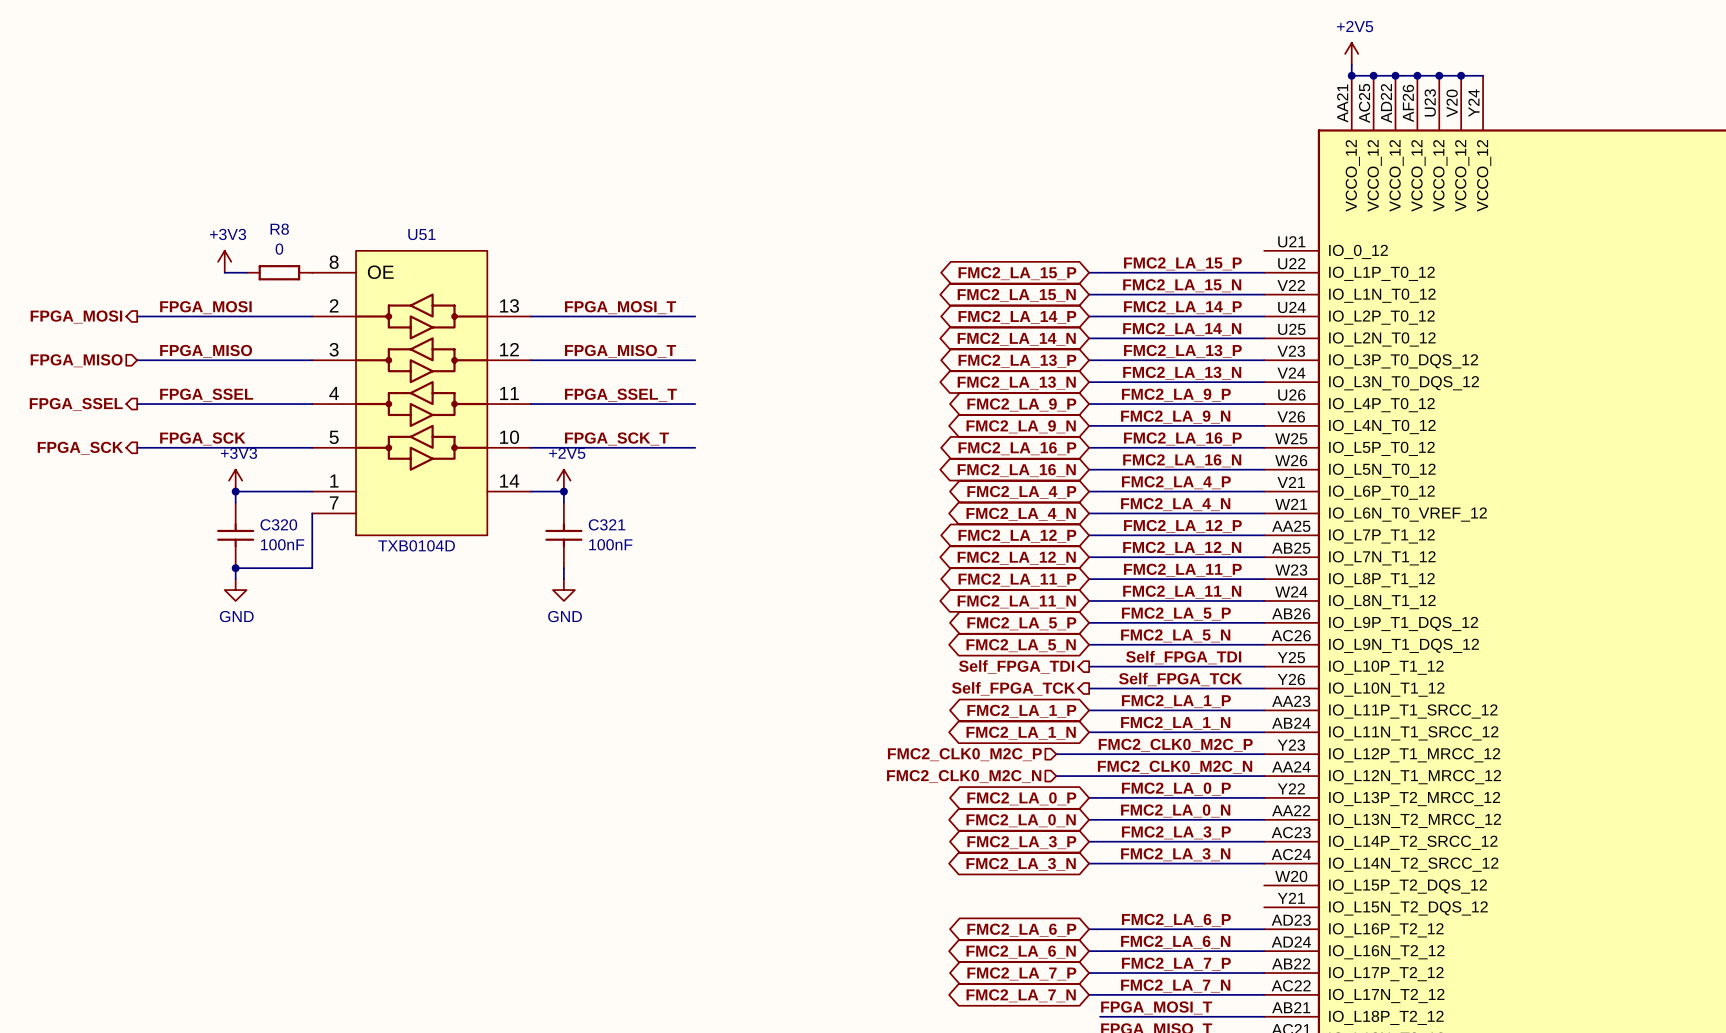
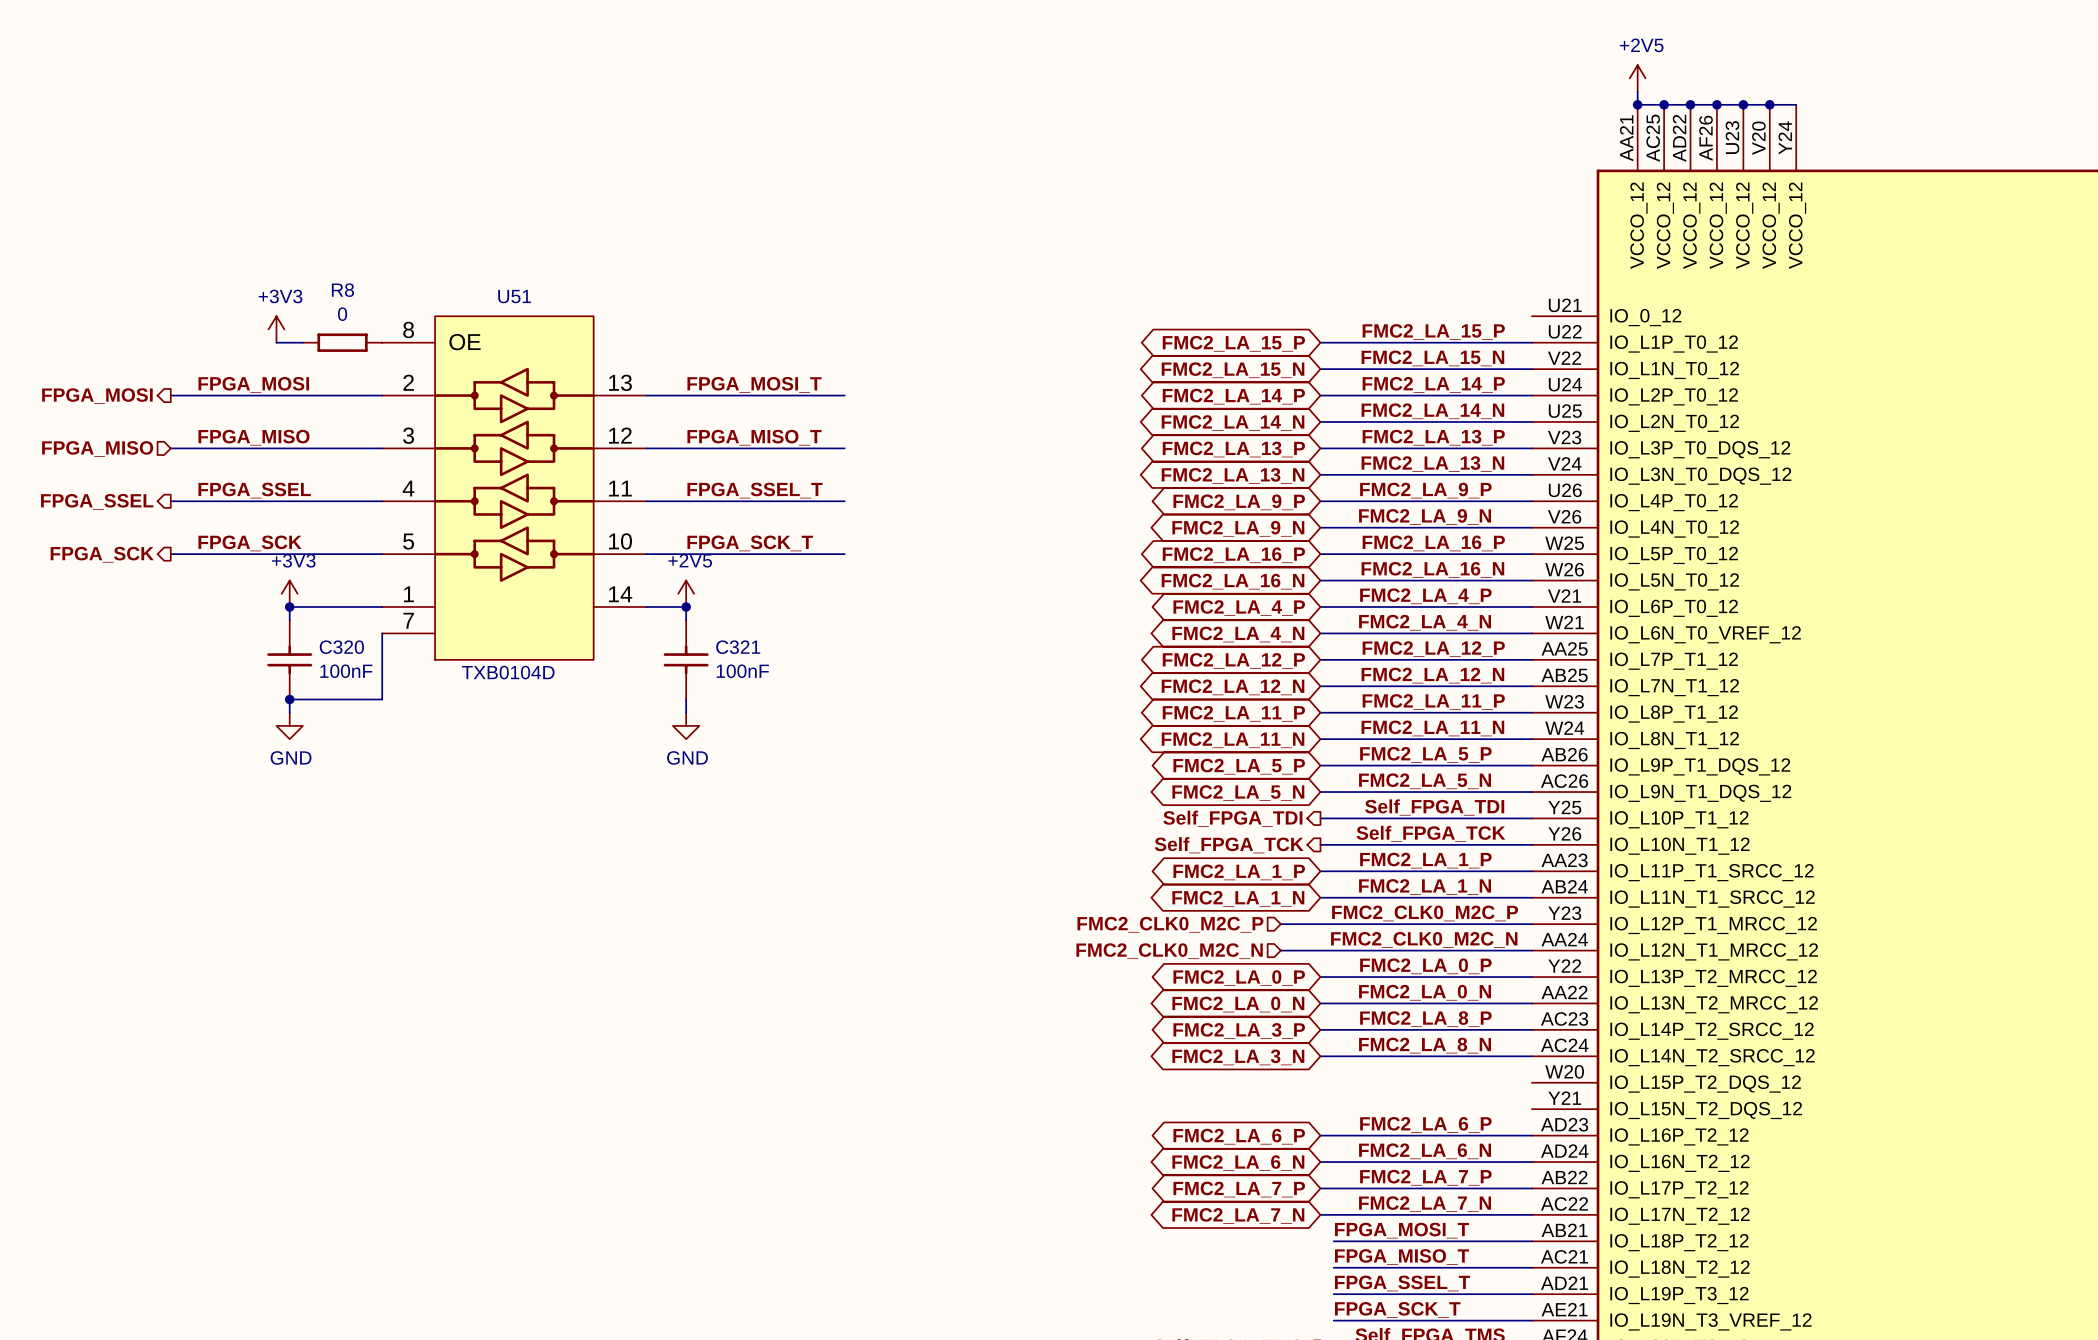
label: FMC2_LA_3_P (1176, 832) -> FMC2_LA_8_P (1425, 1019)
label: FMC2_LA_3_N (1175, 854) -> FMC2_LA_8_N (1425, 1045)

